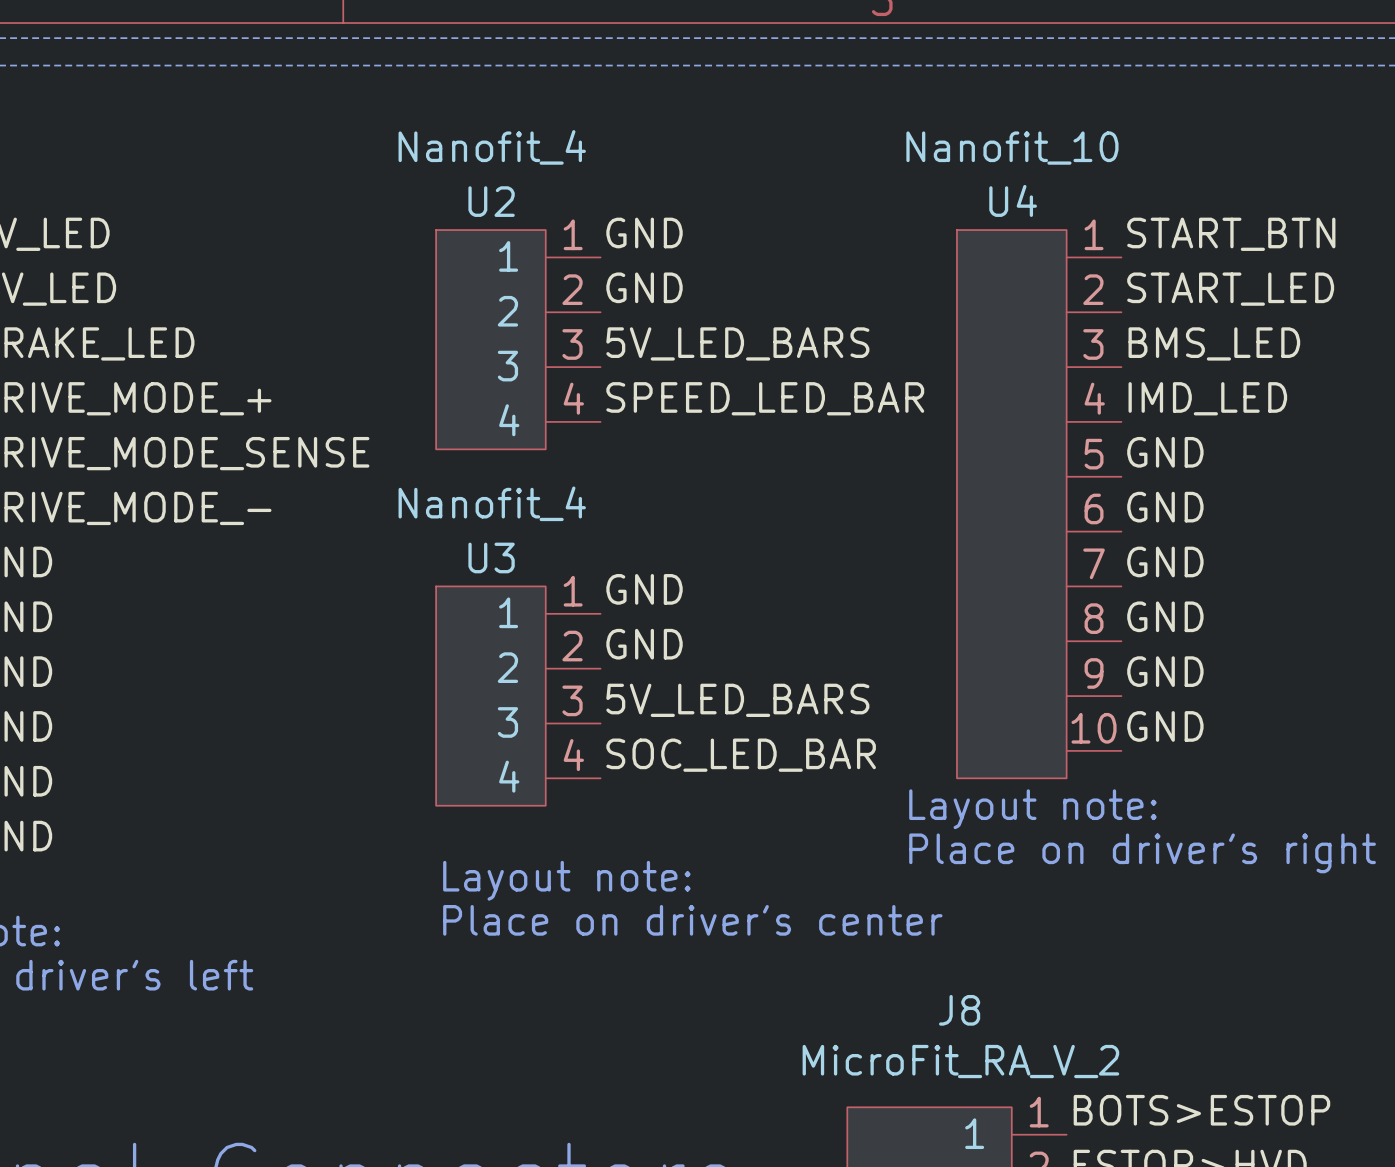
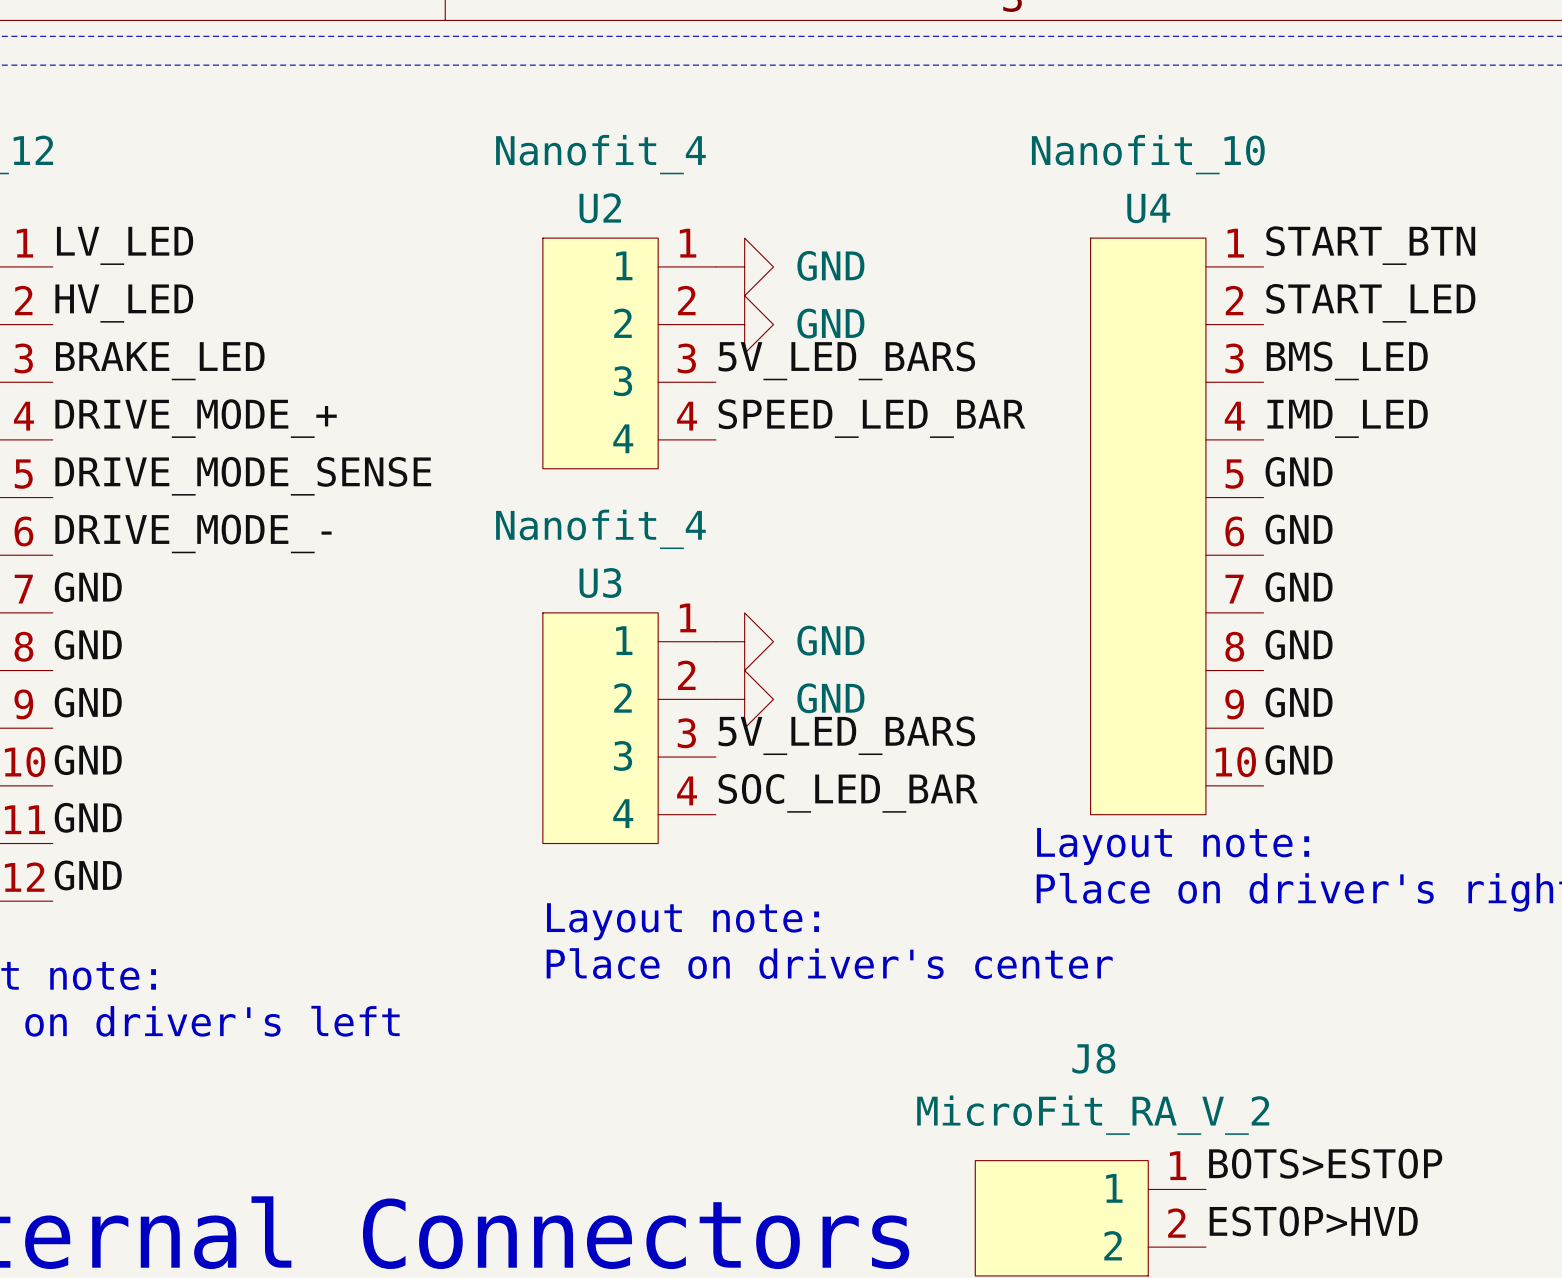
label: GND (644, 232) -> none
power symbol: none -> GND (744, 266)
label: GND (644, 287) -> none
power symbol: none -> GND (744, 324)
label: GND (644, 589) -> none
power symbol: none -> GND (744, 641)
label: GND (644, 644) -> none
power symbol: none -> GND (744, 699)

